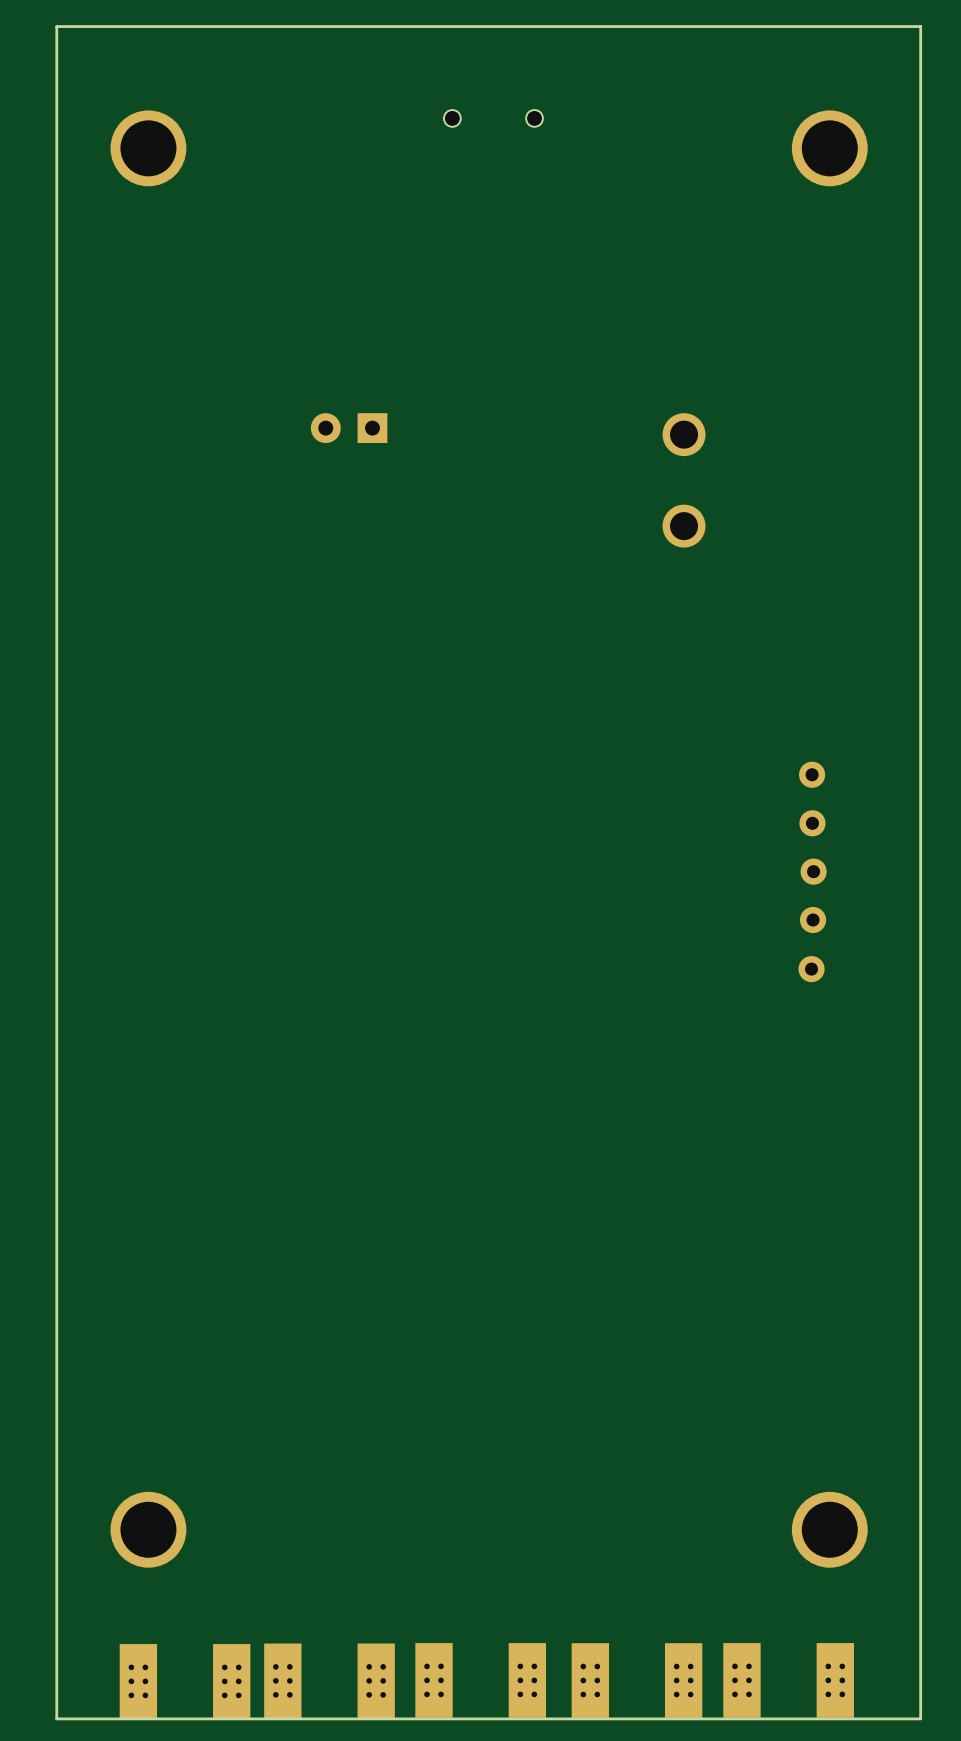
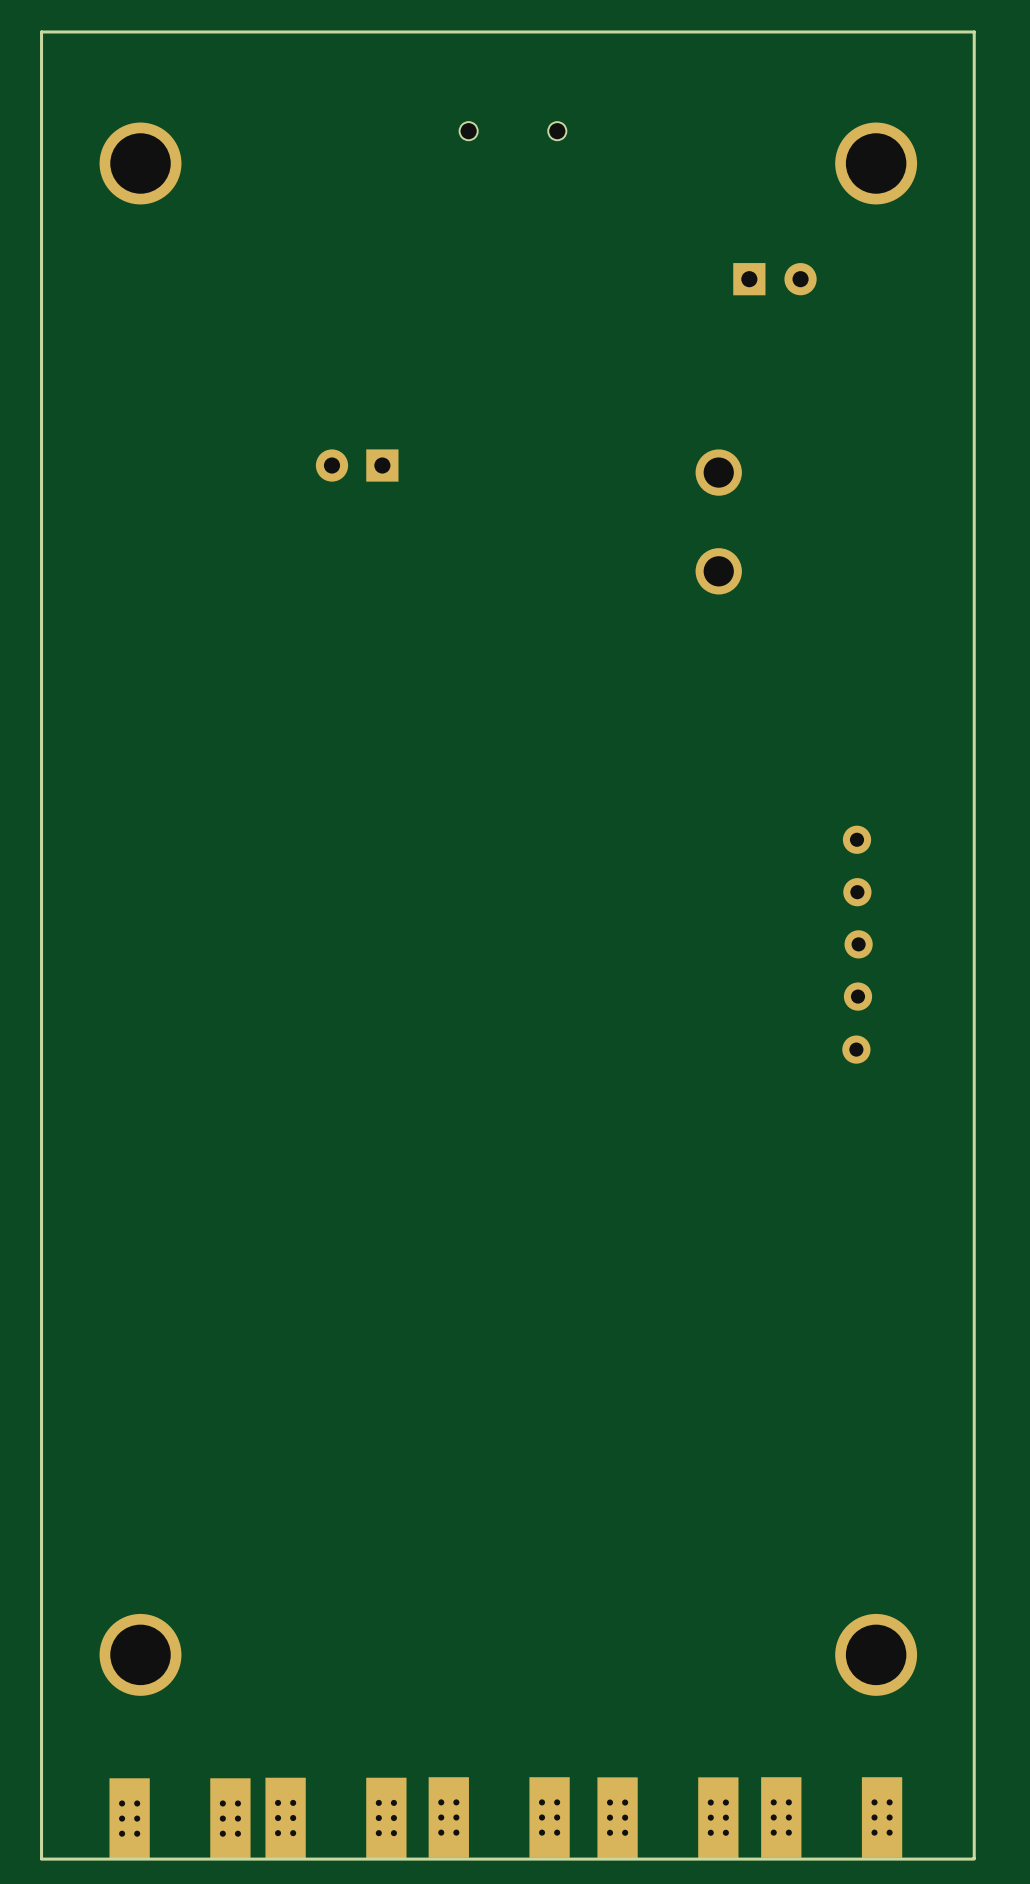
part: none -> (774, 279)

